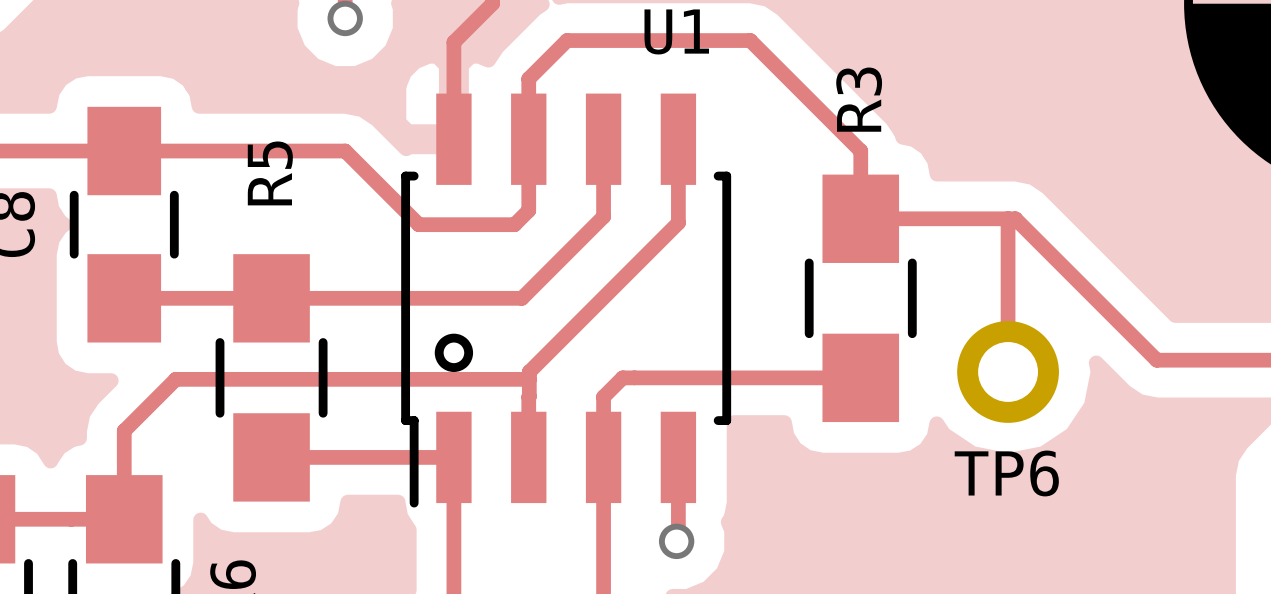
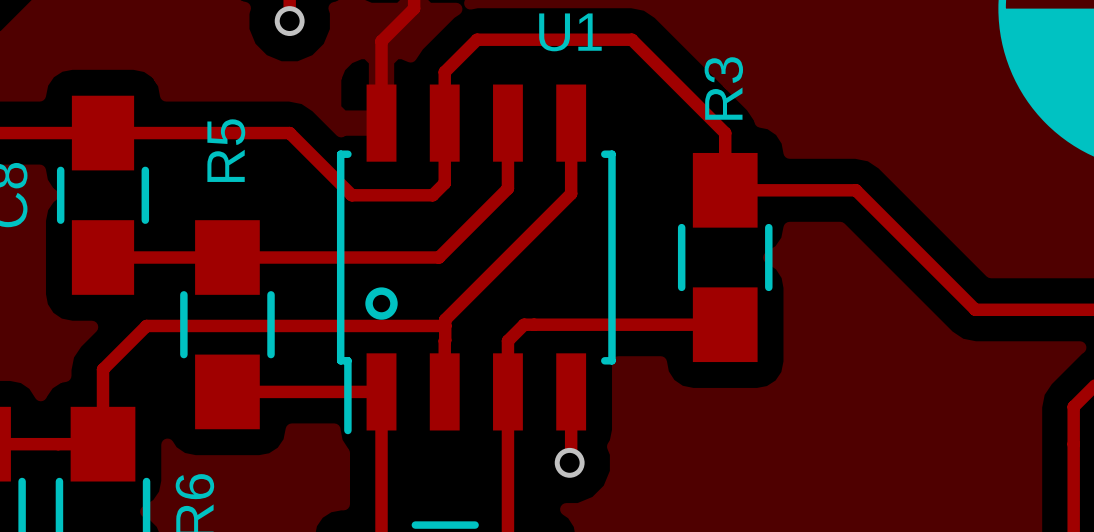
track: (1008, 218) (1008, 371) -> none
TP6: (1008, 371) -> none

